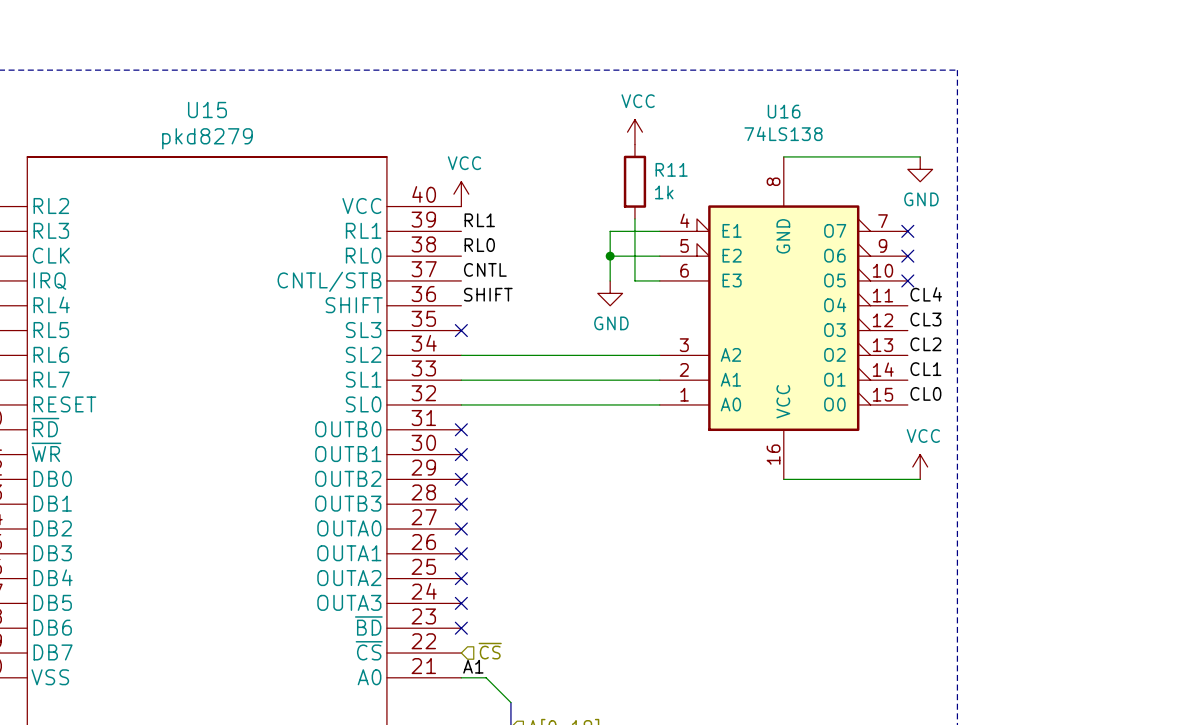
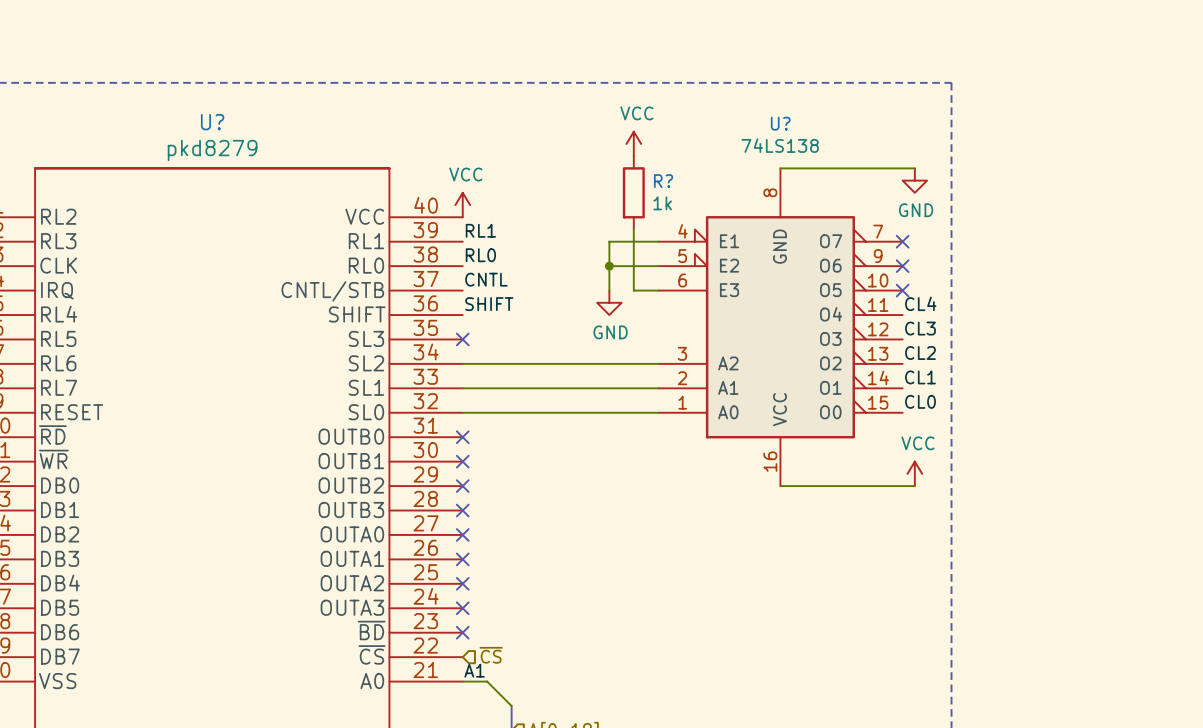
U15 name: U15 (207, 110) -> U? (212, 122)
U16 name: U16 (784, 111) -> U? (780, 123)
R11 name: R11 (671, 169) -> R? (663, 181)

